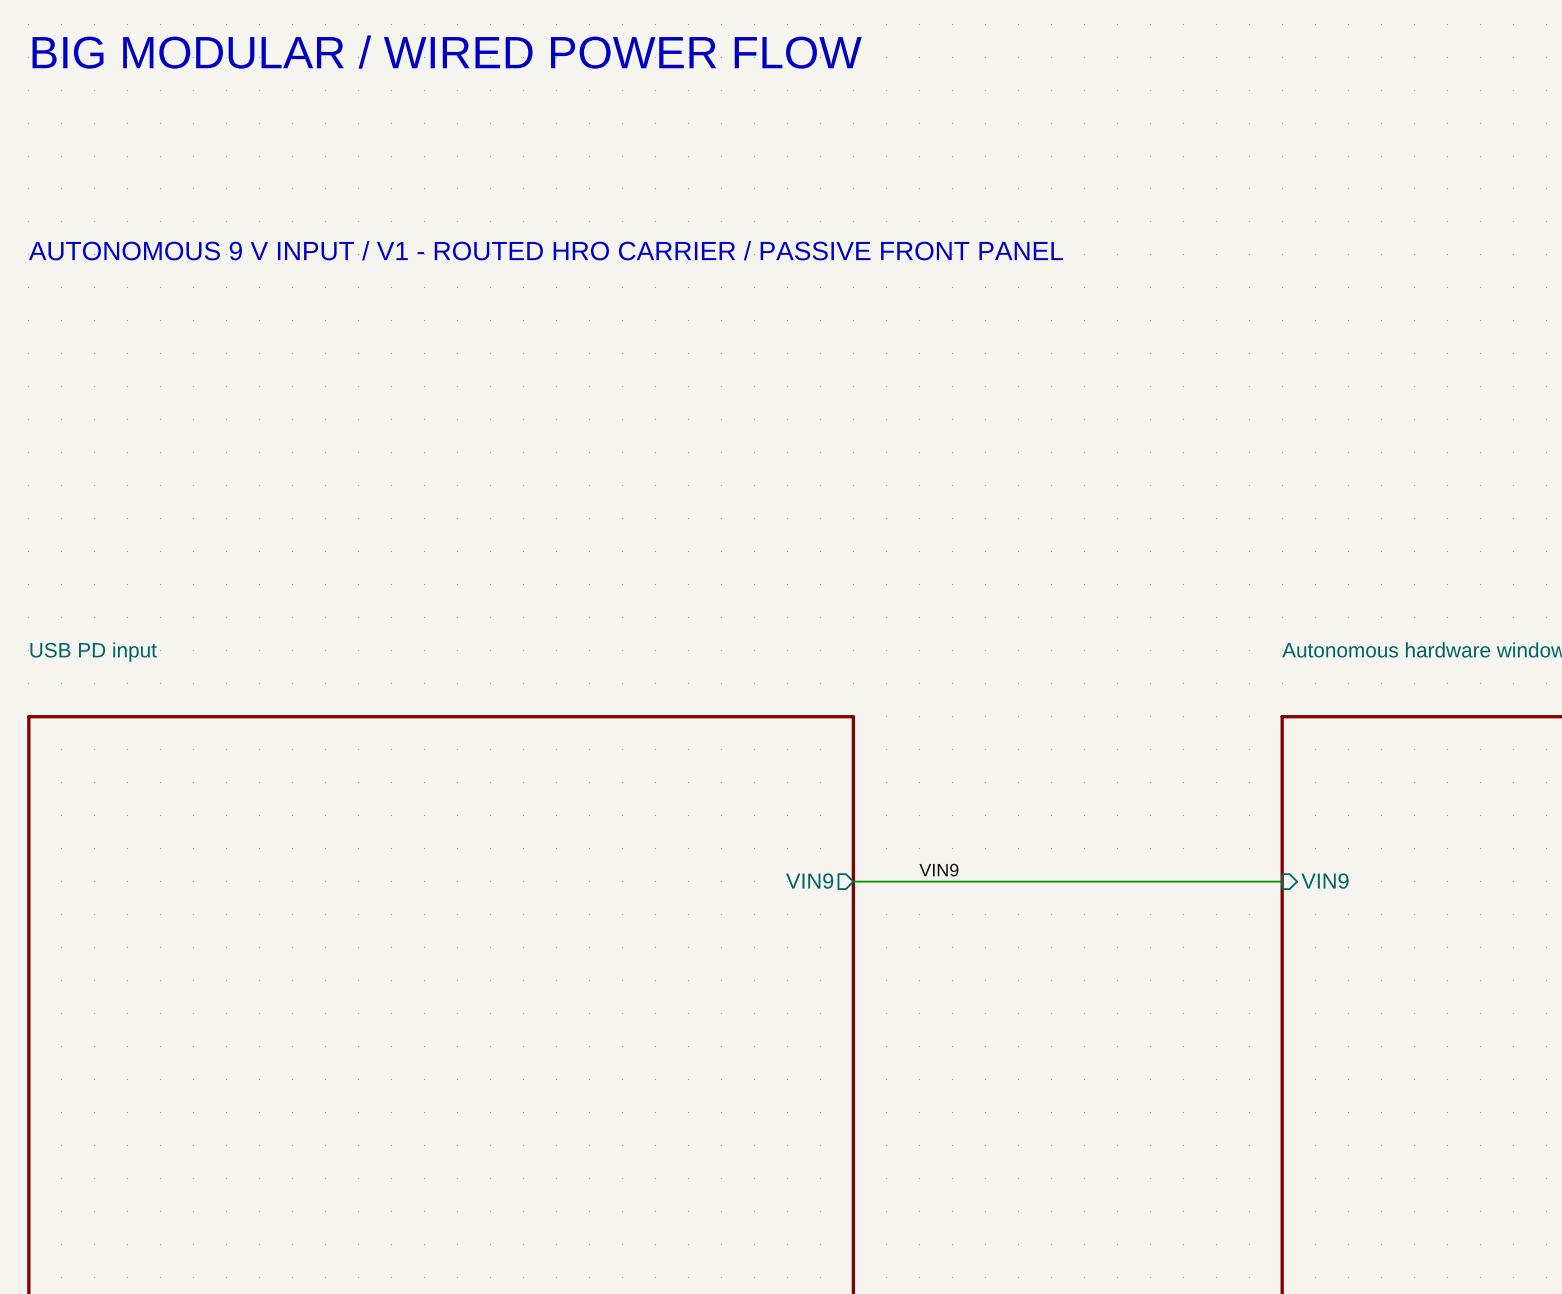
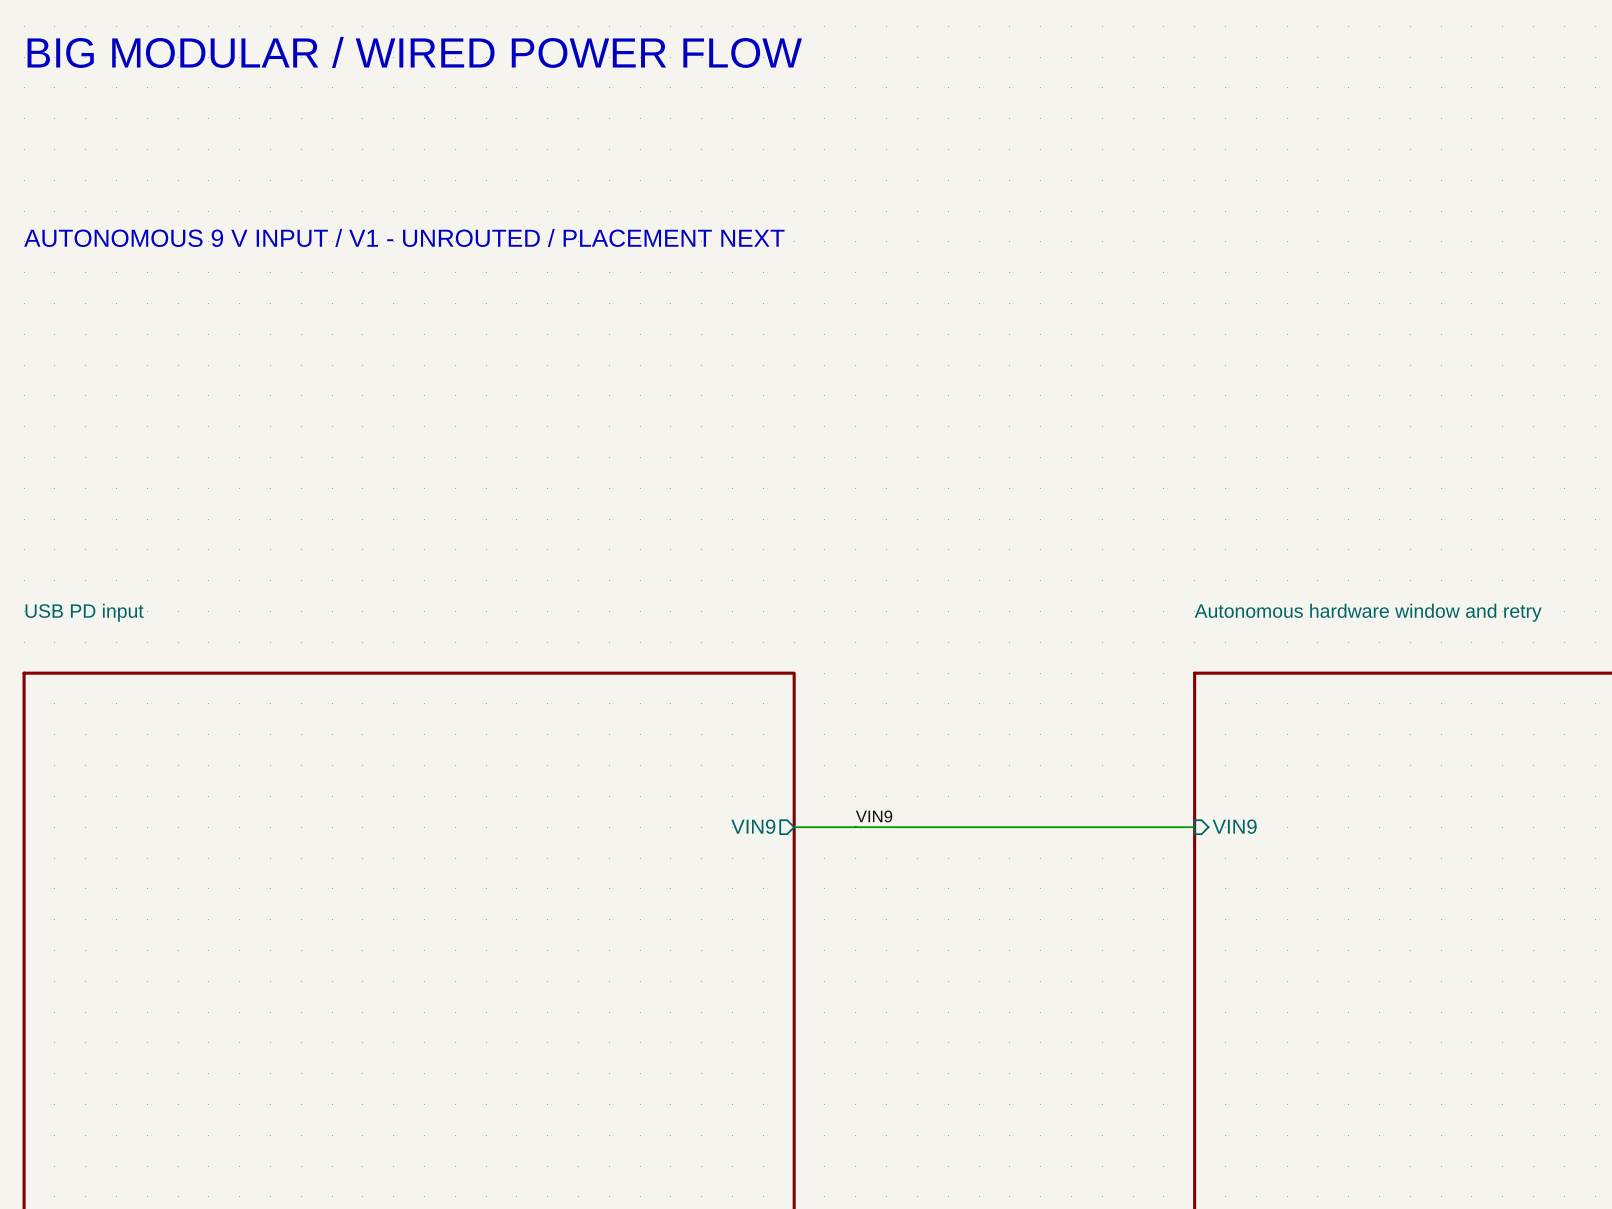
text: AUTONOMOUS 9 V INPUT / V1 - ROUTED HRO CARRIER / PASSIVE FRONT PANEL (545, 250) -> AUTONOMOUS 9 V INPUT / V1 - UNROUTED / PLACEMENT NEXT (404, 237)

